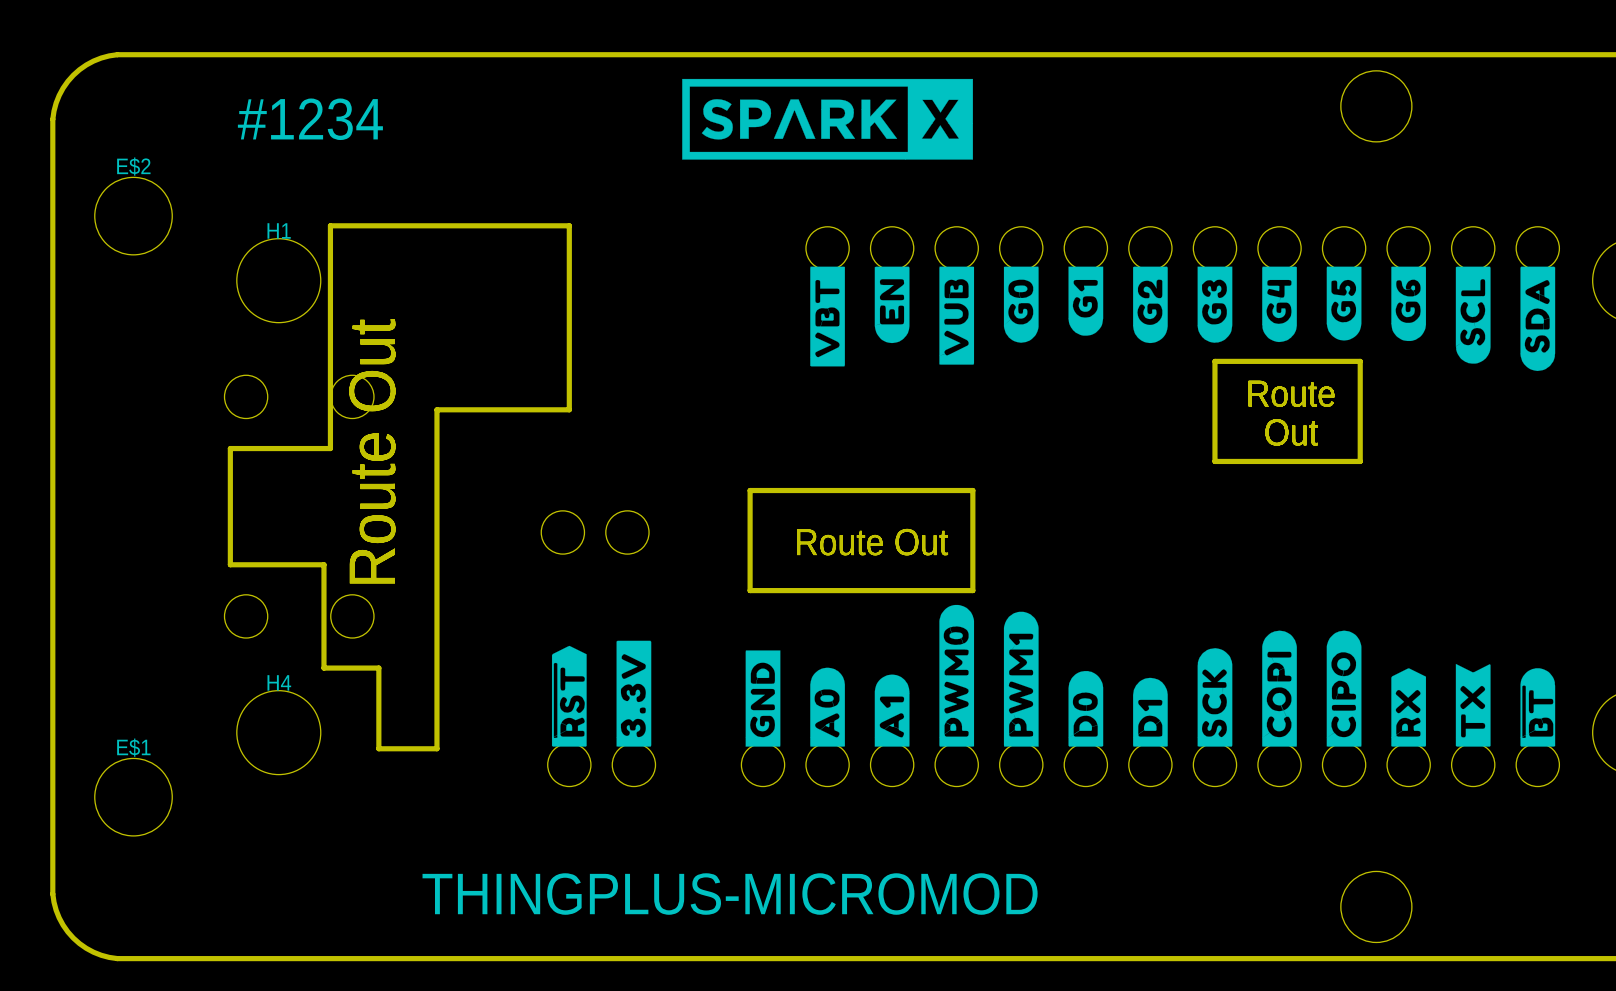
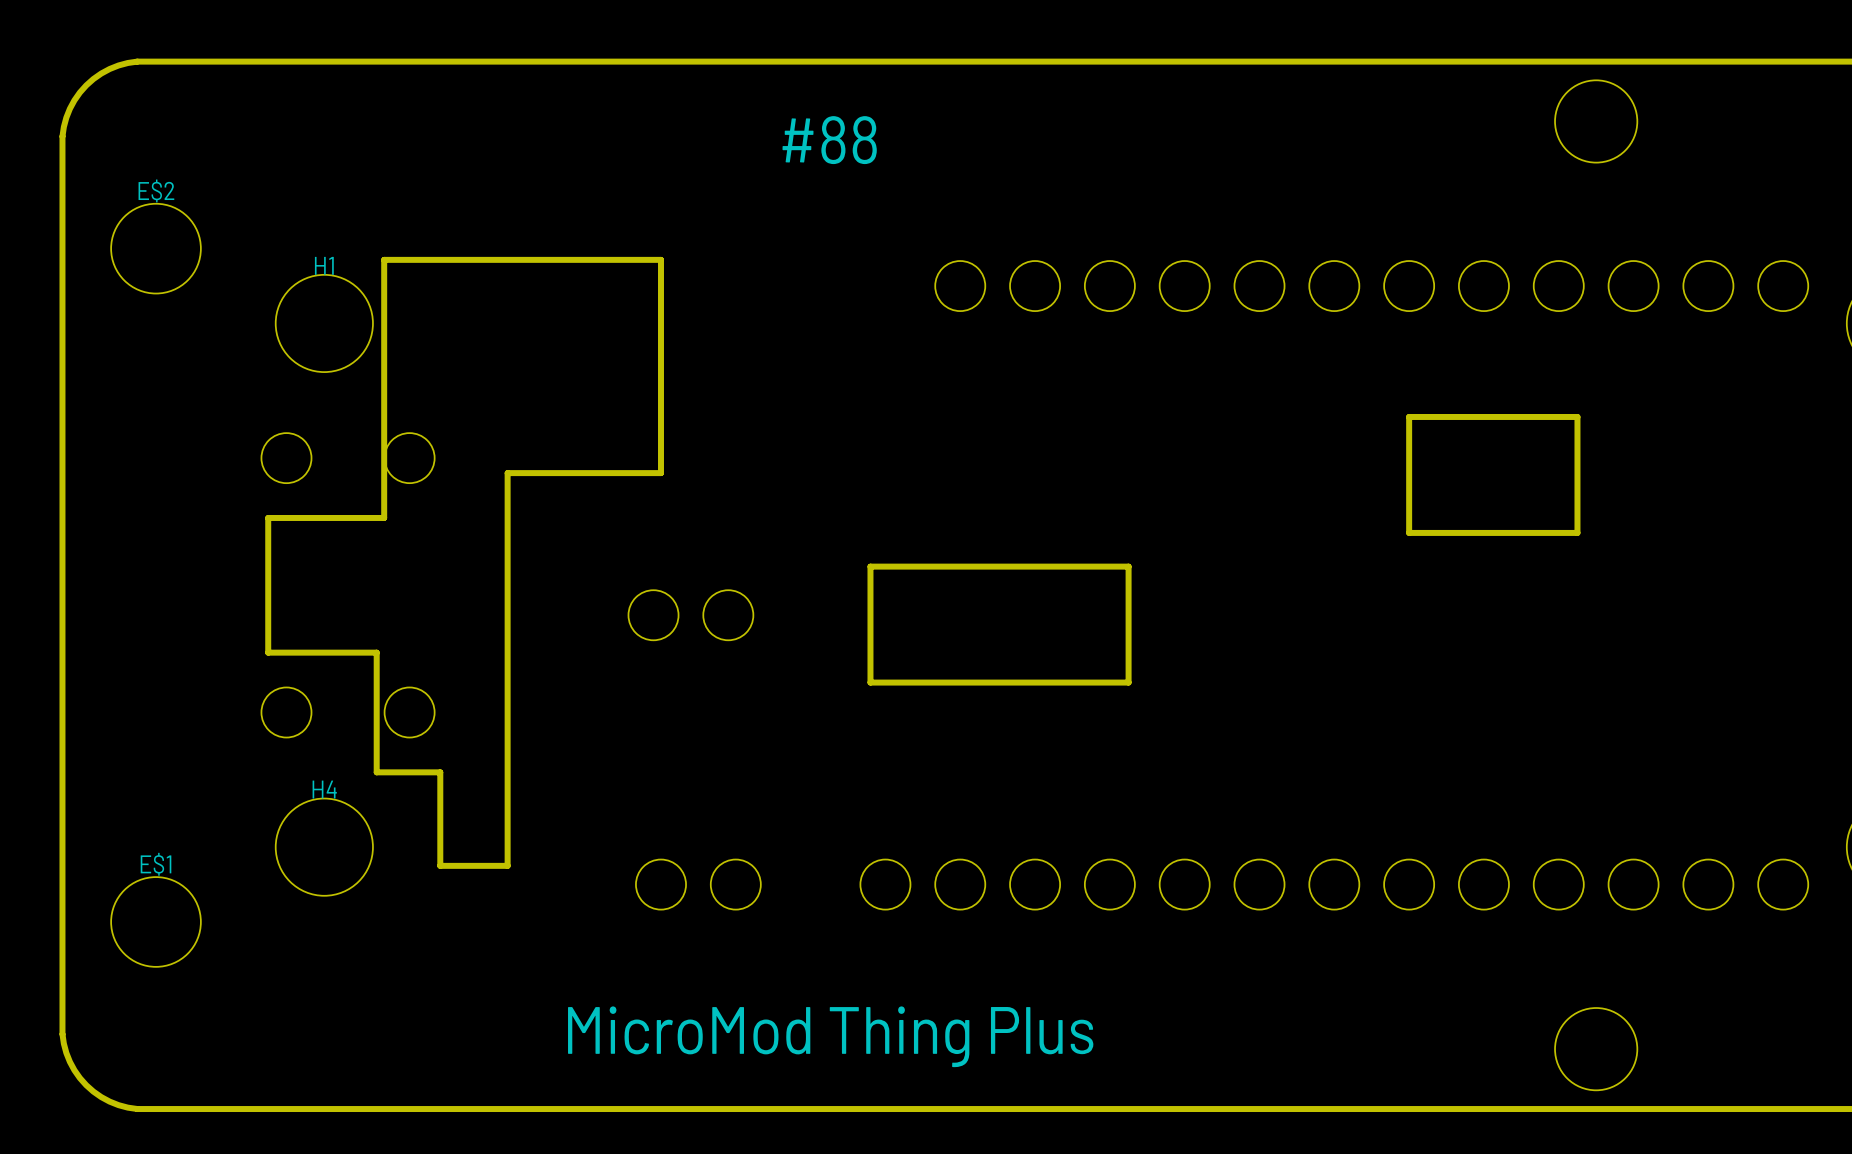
drawing: [682, 78, 973, 160] -> none
text: #1234 (310, 119) -> none
text: none -> #88 (829, 140)
drawing: [810, 266, 1556, 372] -> none
text: Route (1291, 393) -> none
text: Out (1291, 432) -> none
text: Route Out (372, 451) -> none
text: Route Out (872, 542) -> none
drawing: [745, 604, 1556, 747] -> none
drawing: [551, 640, 652, 747] -> none
text: THINGPLUS-MICROMOD (730, 894) -> MicroMod Thing Plus (830, 1036)

